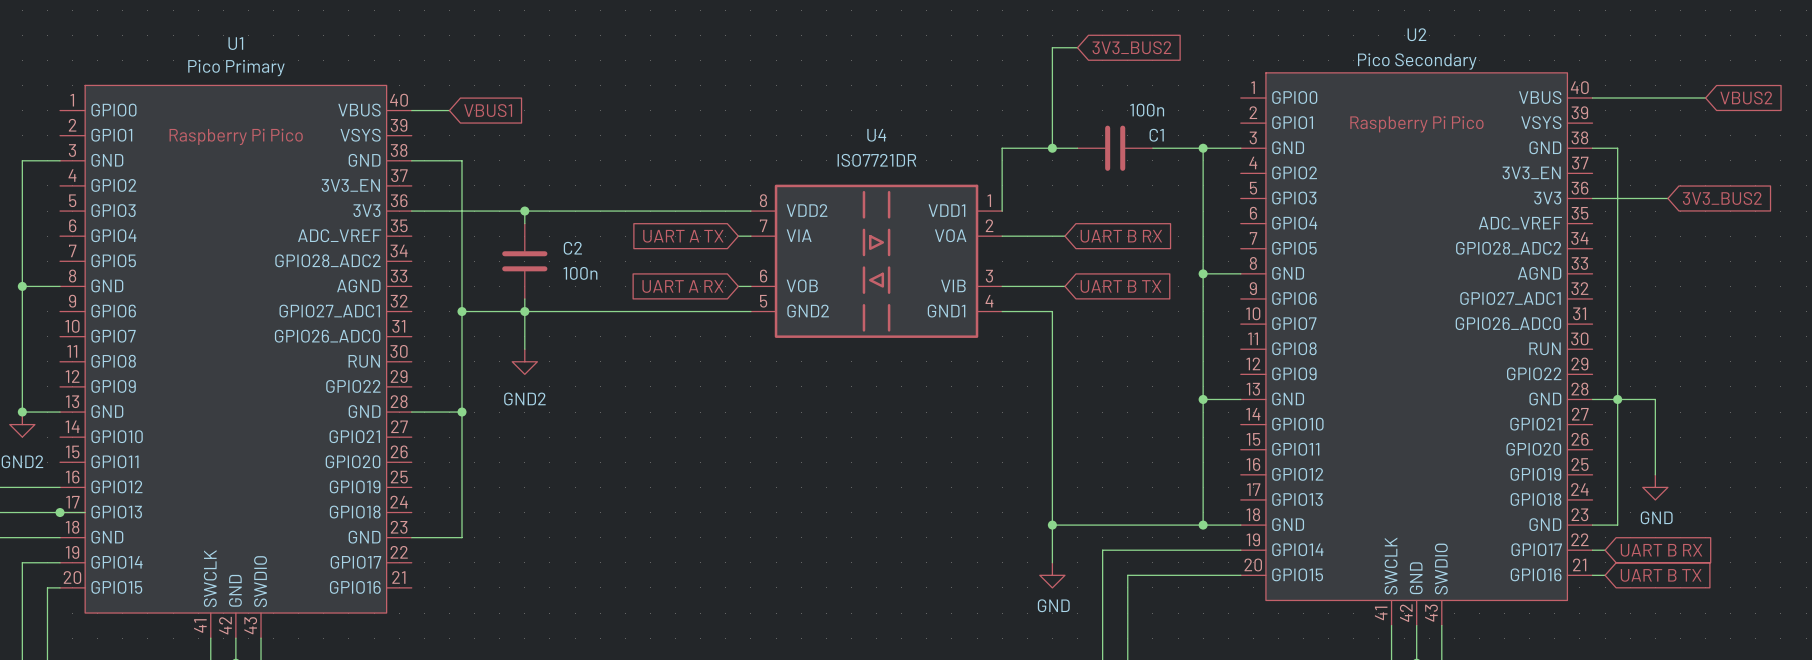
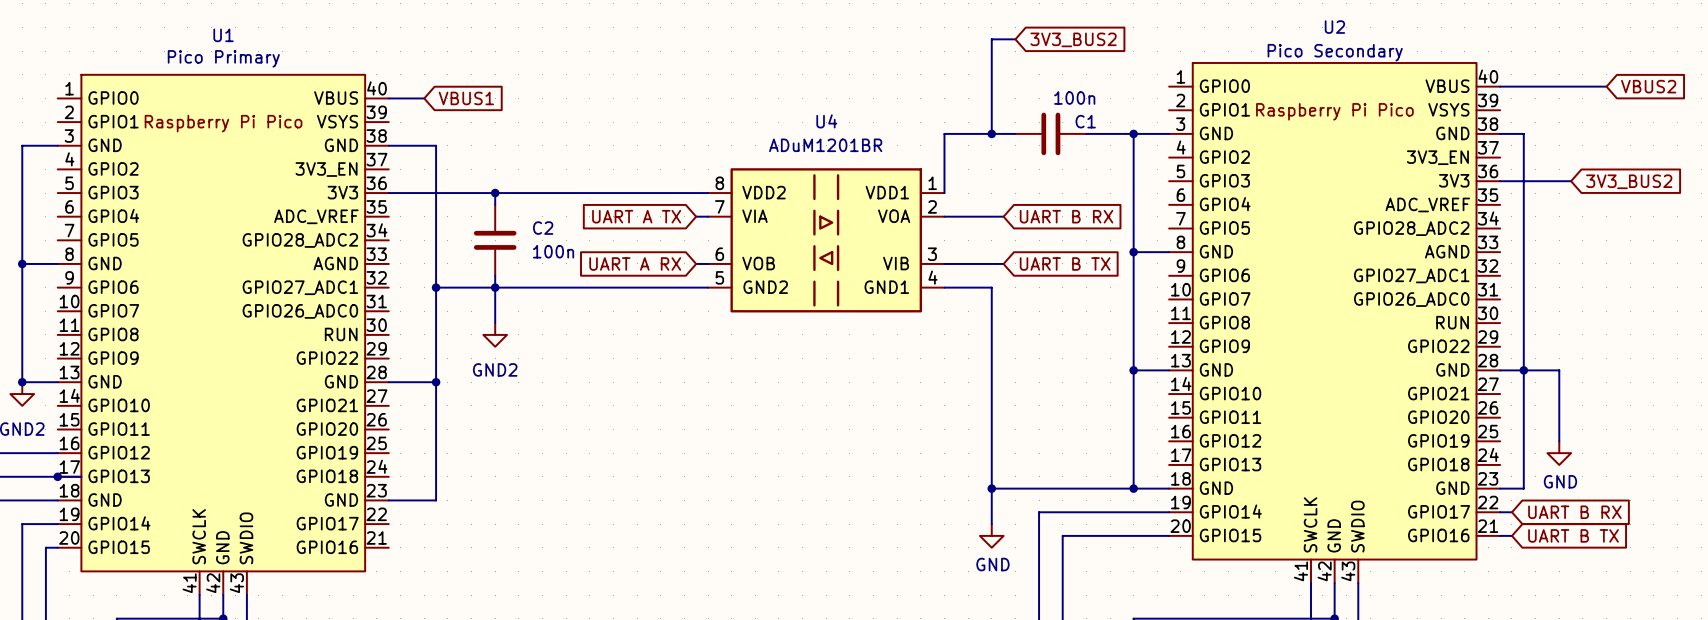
U4 value: ISO7721DR (876, 160) -> ADuM1201BR (825, 145)

